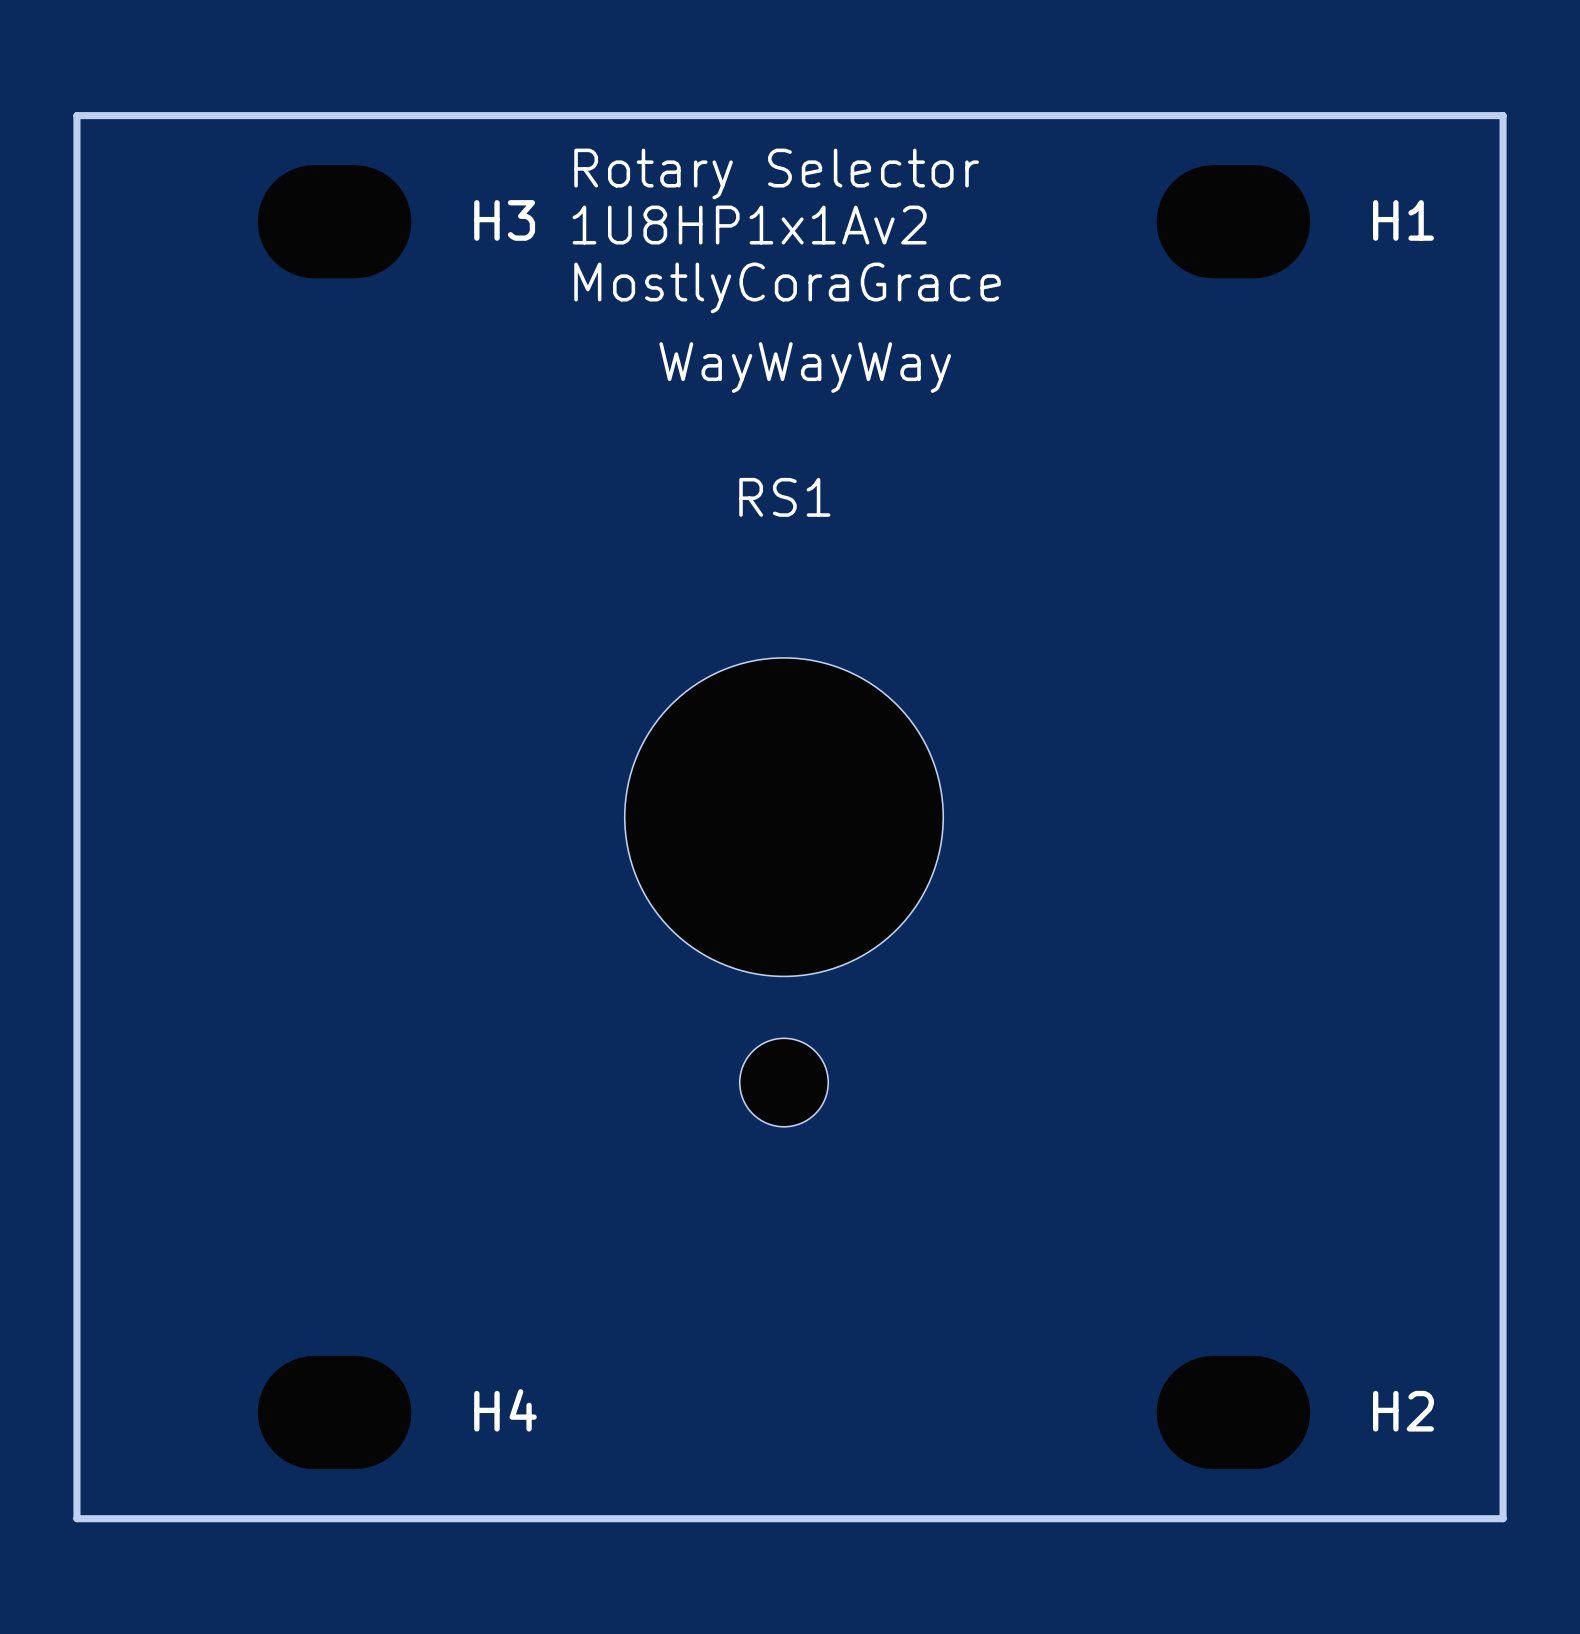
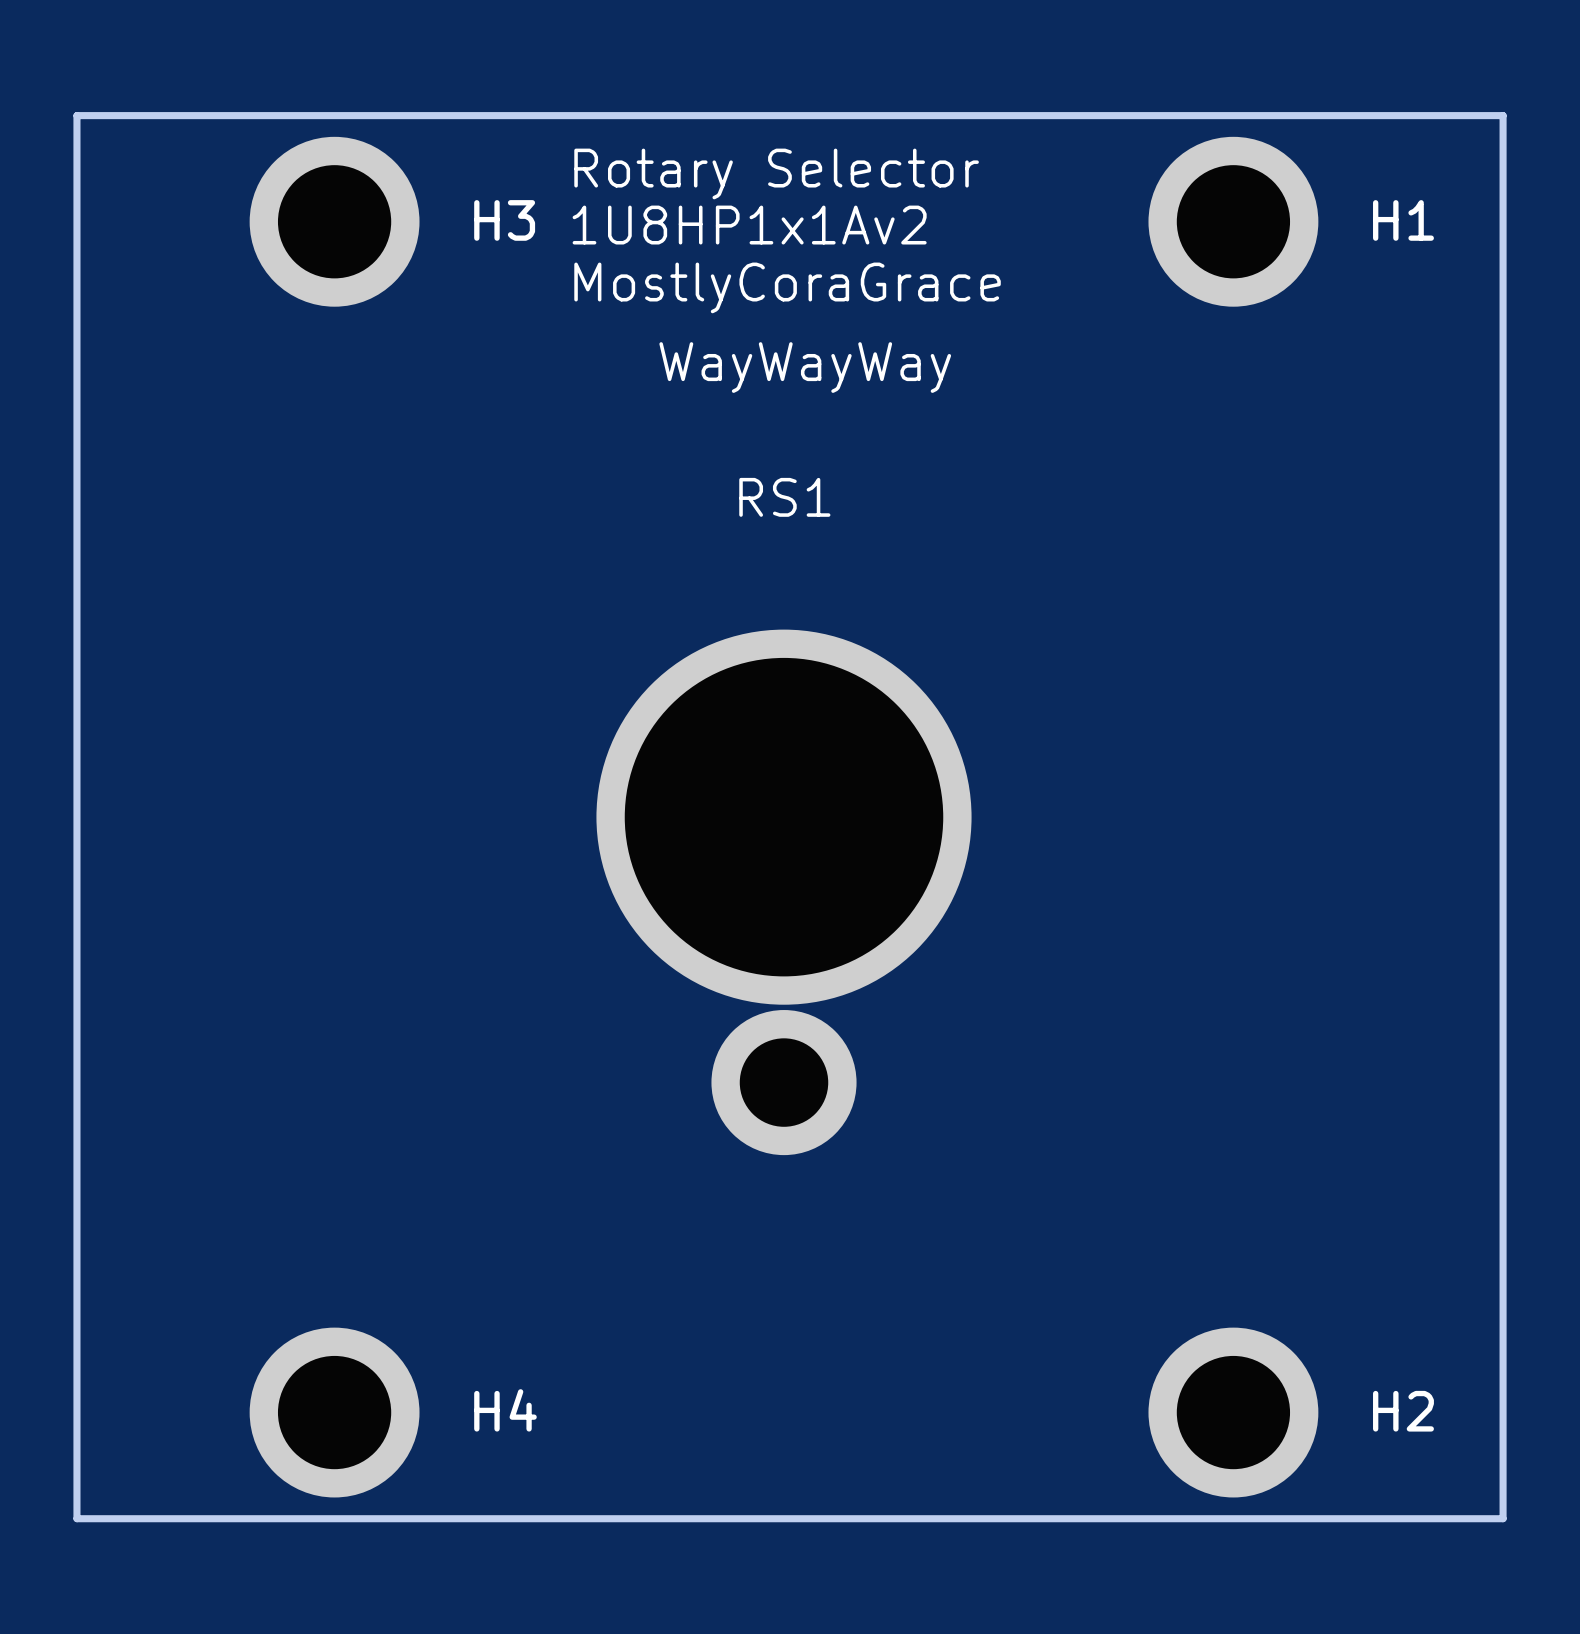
H3 footprint: [257, 165, 412, 279] -> [249, 136, 420, 307]
H1 footprint: [1156, 165, 1311, 279] -> [1148, 136, 1319, 307]
RS1 footprint: [624, 657, 944, 1127] -> [596, 629, 972, 1156]
H4 footprint: [257, 1355, 412, 1470] -> [249, 1327, 420, 1498]
H2 footprint: [1156, 1355, 1311, 1470] -> [1148, 1327, 1319, 1498]

